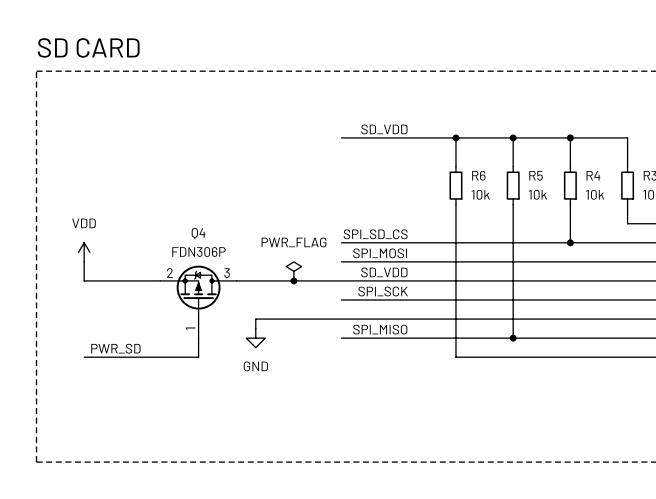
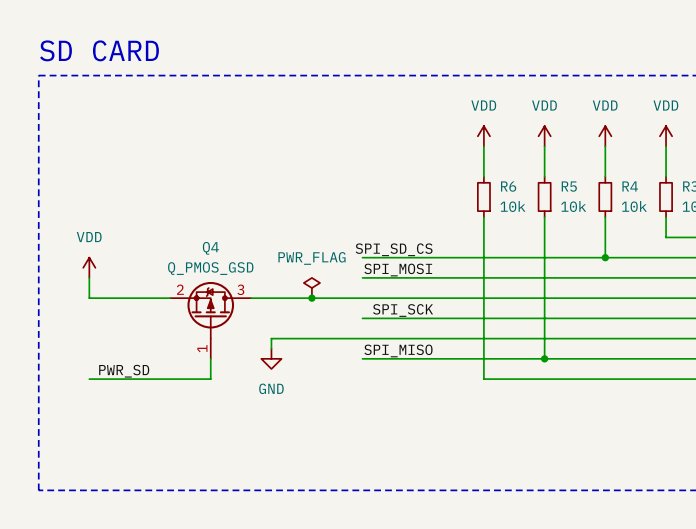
power symbol: none -> VDD (483, 136)
power symbol: none -> VDD (544, 136)
power symbol: none -> VDD (605, 136)
power symbol: none -> VDD (666, 136)
label: SD_VDD (384, 129) -> none
wire: (341, 137) (627, 137) -> none
junction: (455, 137) -> none
junction: (513, 137) -> none
junction: (570, 137) -> none
Q4 value: FDN306P (198, 251) -> Q_PMOS_GSD (210, 268)
label: SD_VDD (384, 272) -> none

